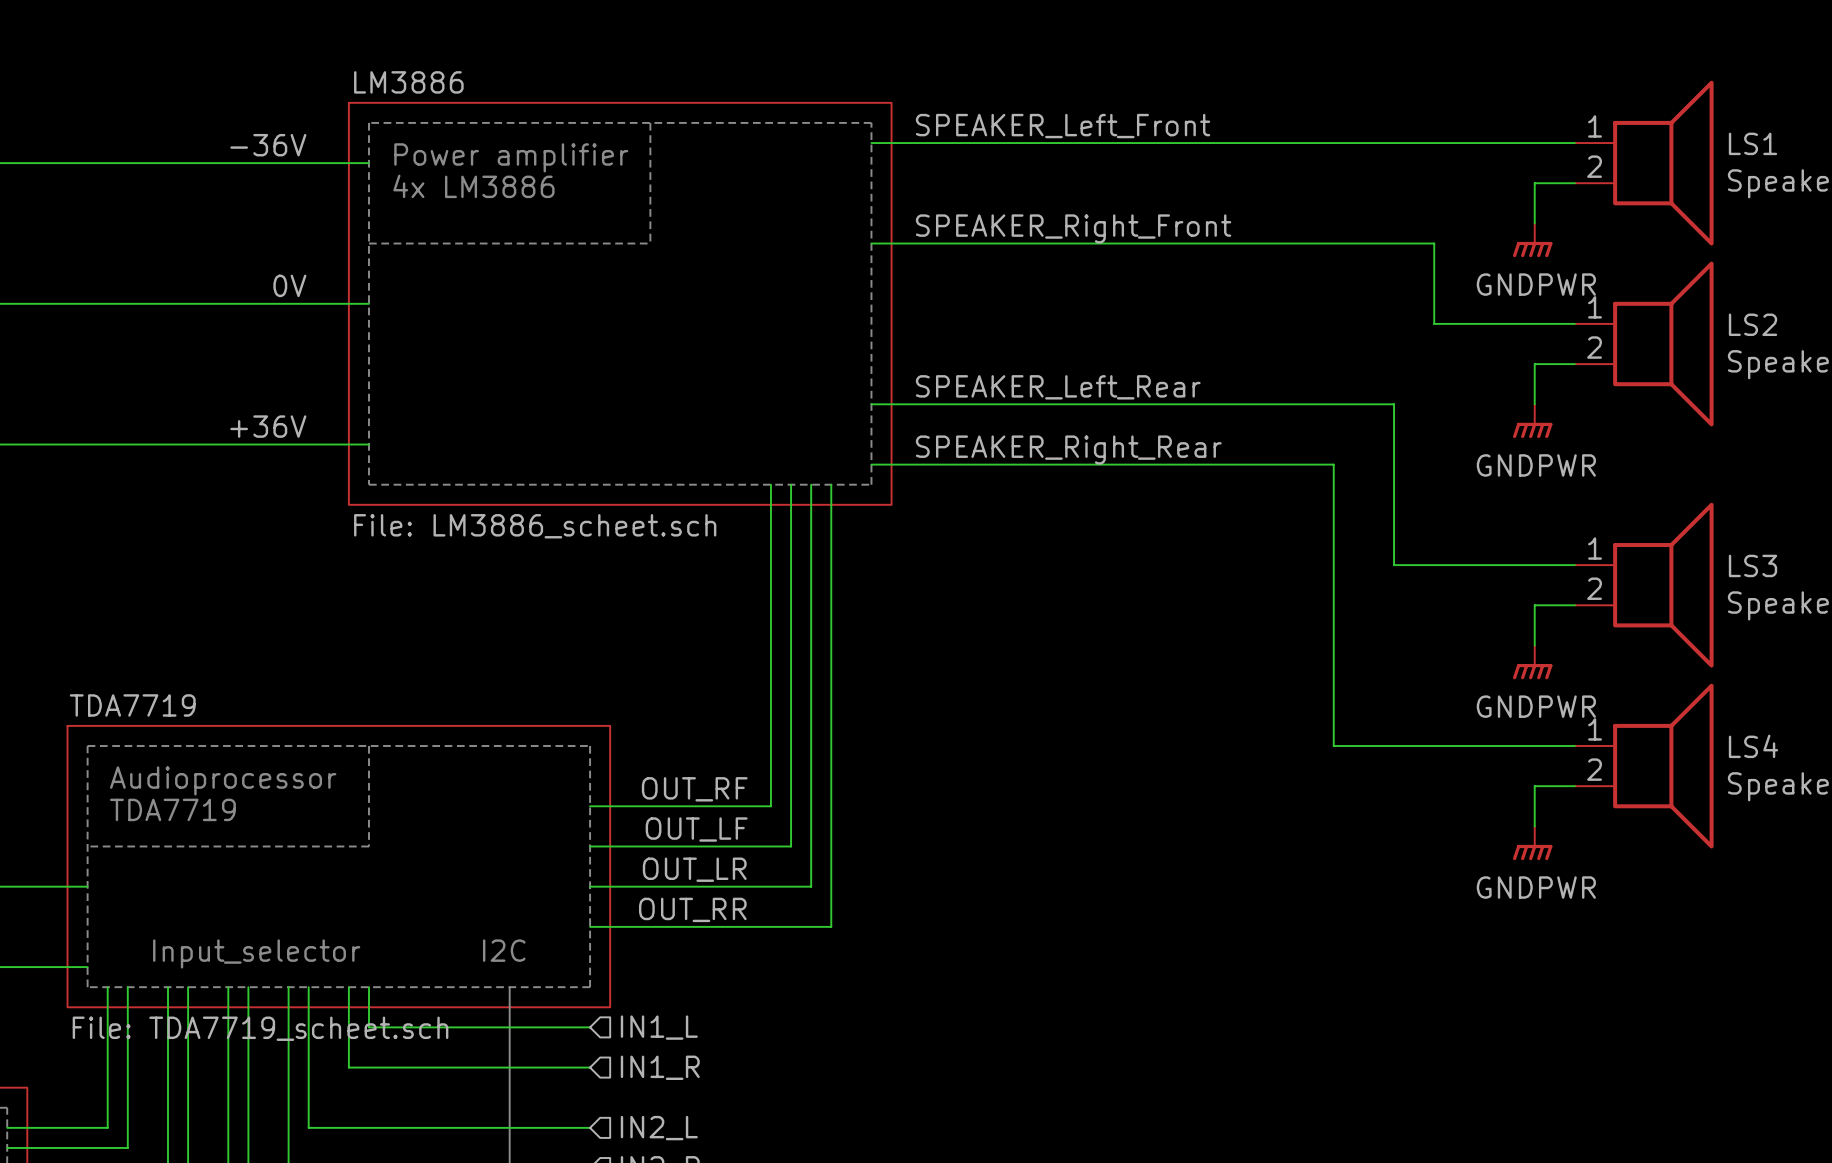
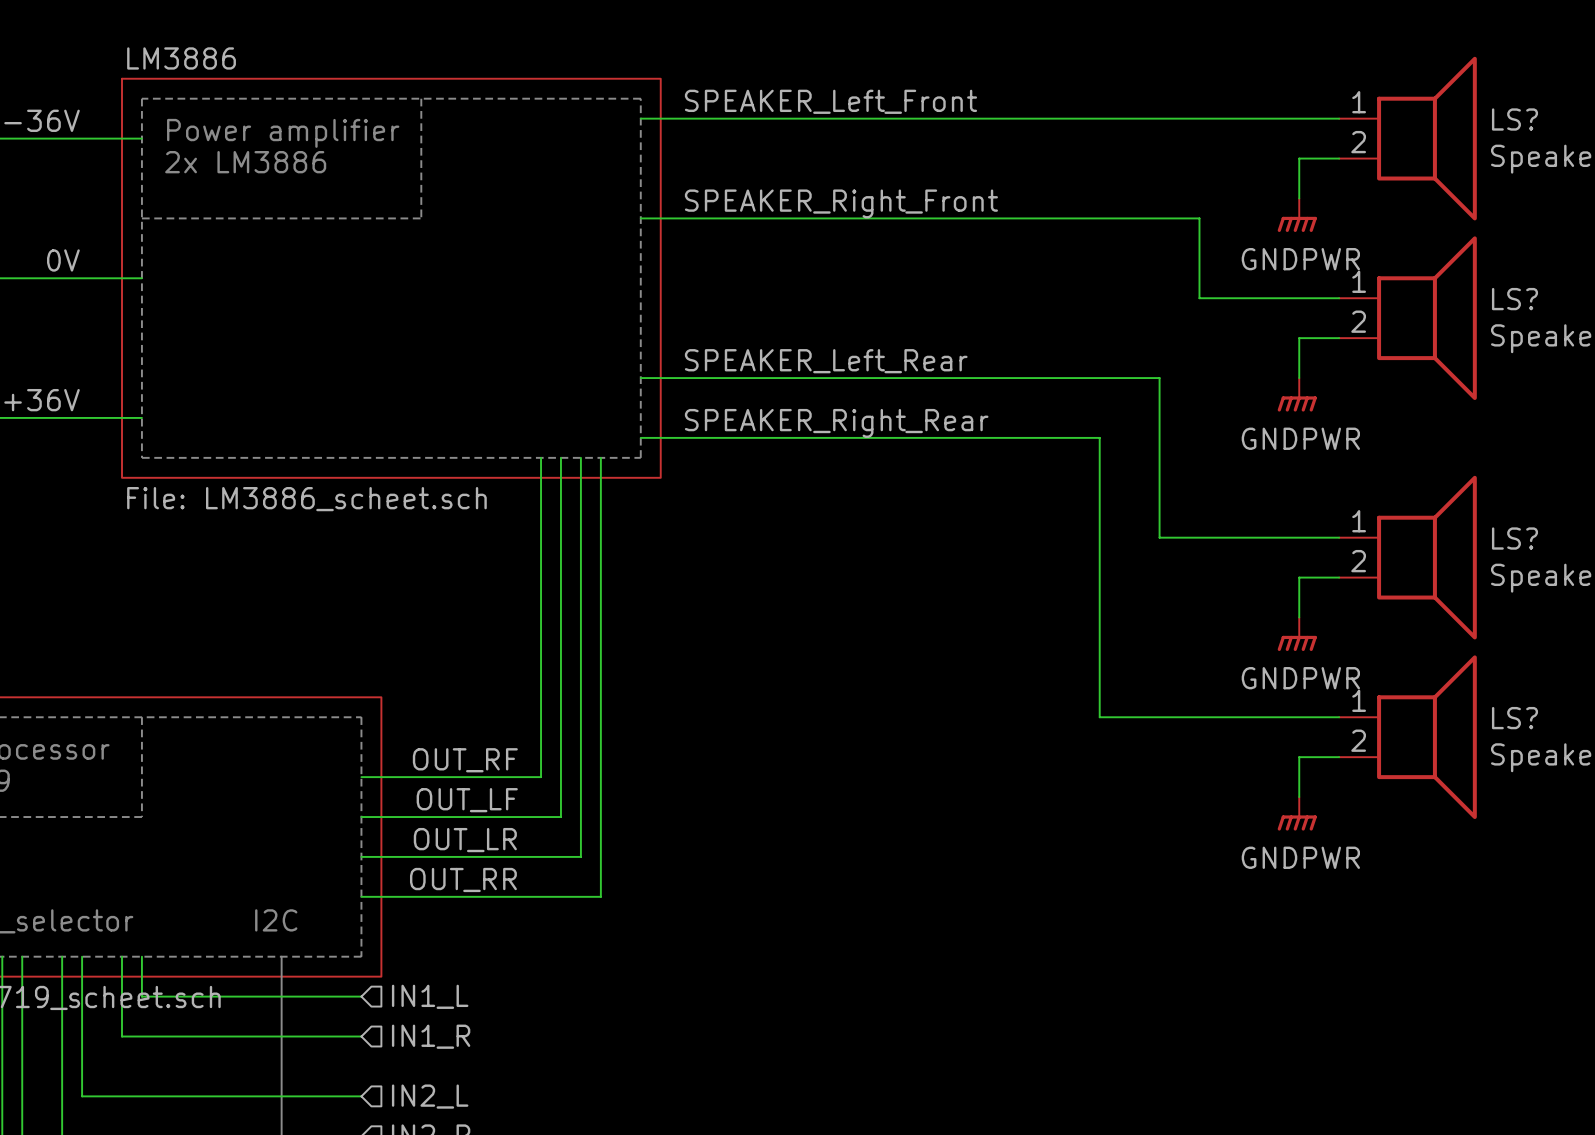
LS1 name: LS1 (1753, 143) -> LS? (1514, 119)
text: 4x LM3886 (473, 186) -> 2x LM3886 (245, 162)
LS2 name: LS2 (1753, 324) -> LS? (1514, 299)
LS3 name: LS3 (1753, 565) -> LS? (1514, 538)
LS4 name: LS4 (1753, 746) -> LS? (1514, 718)

